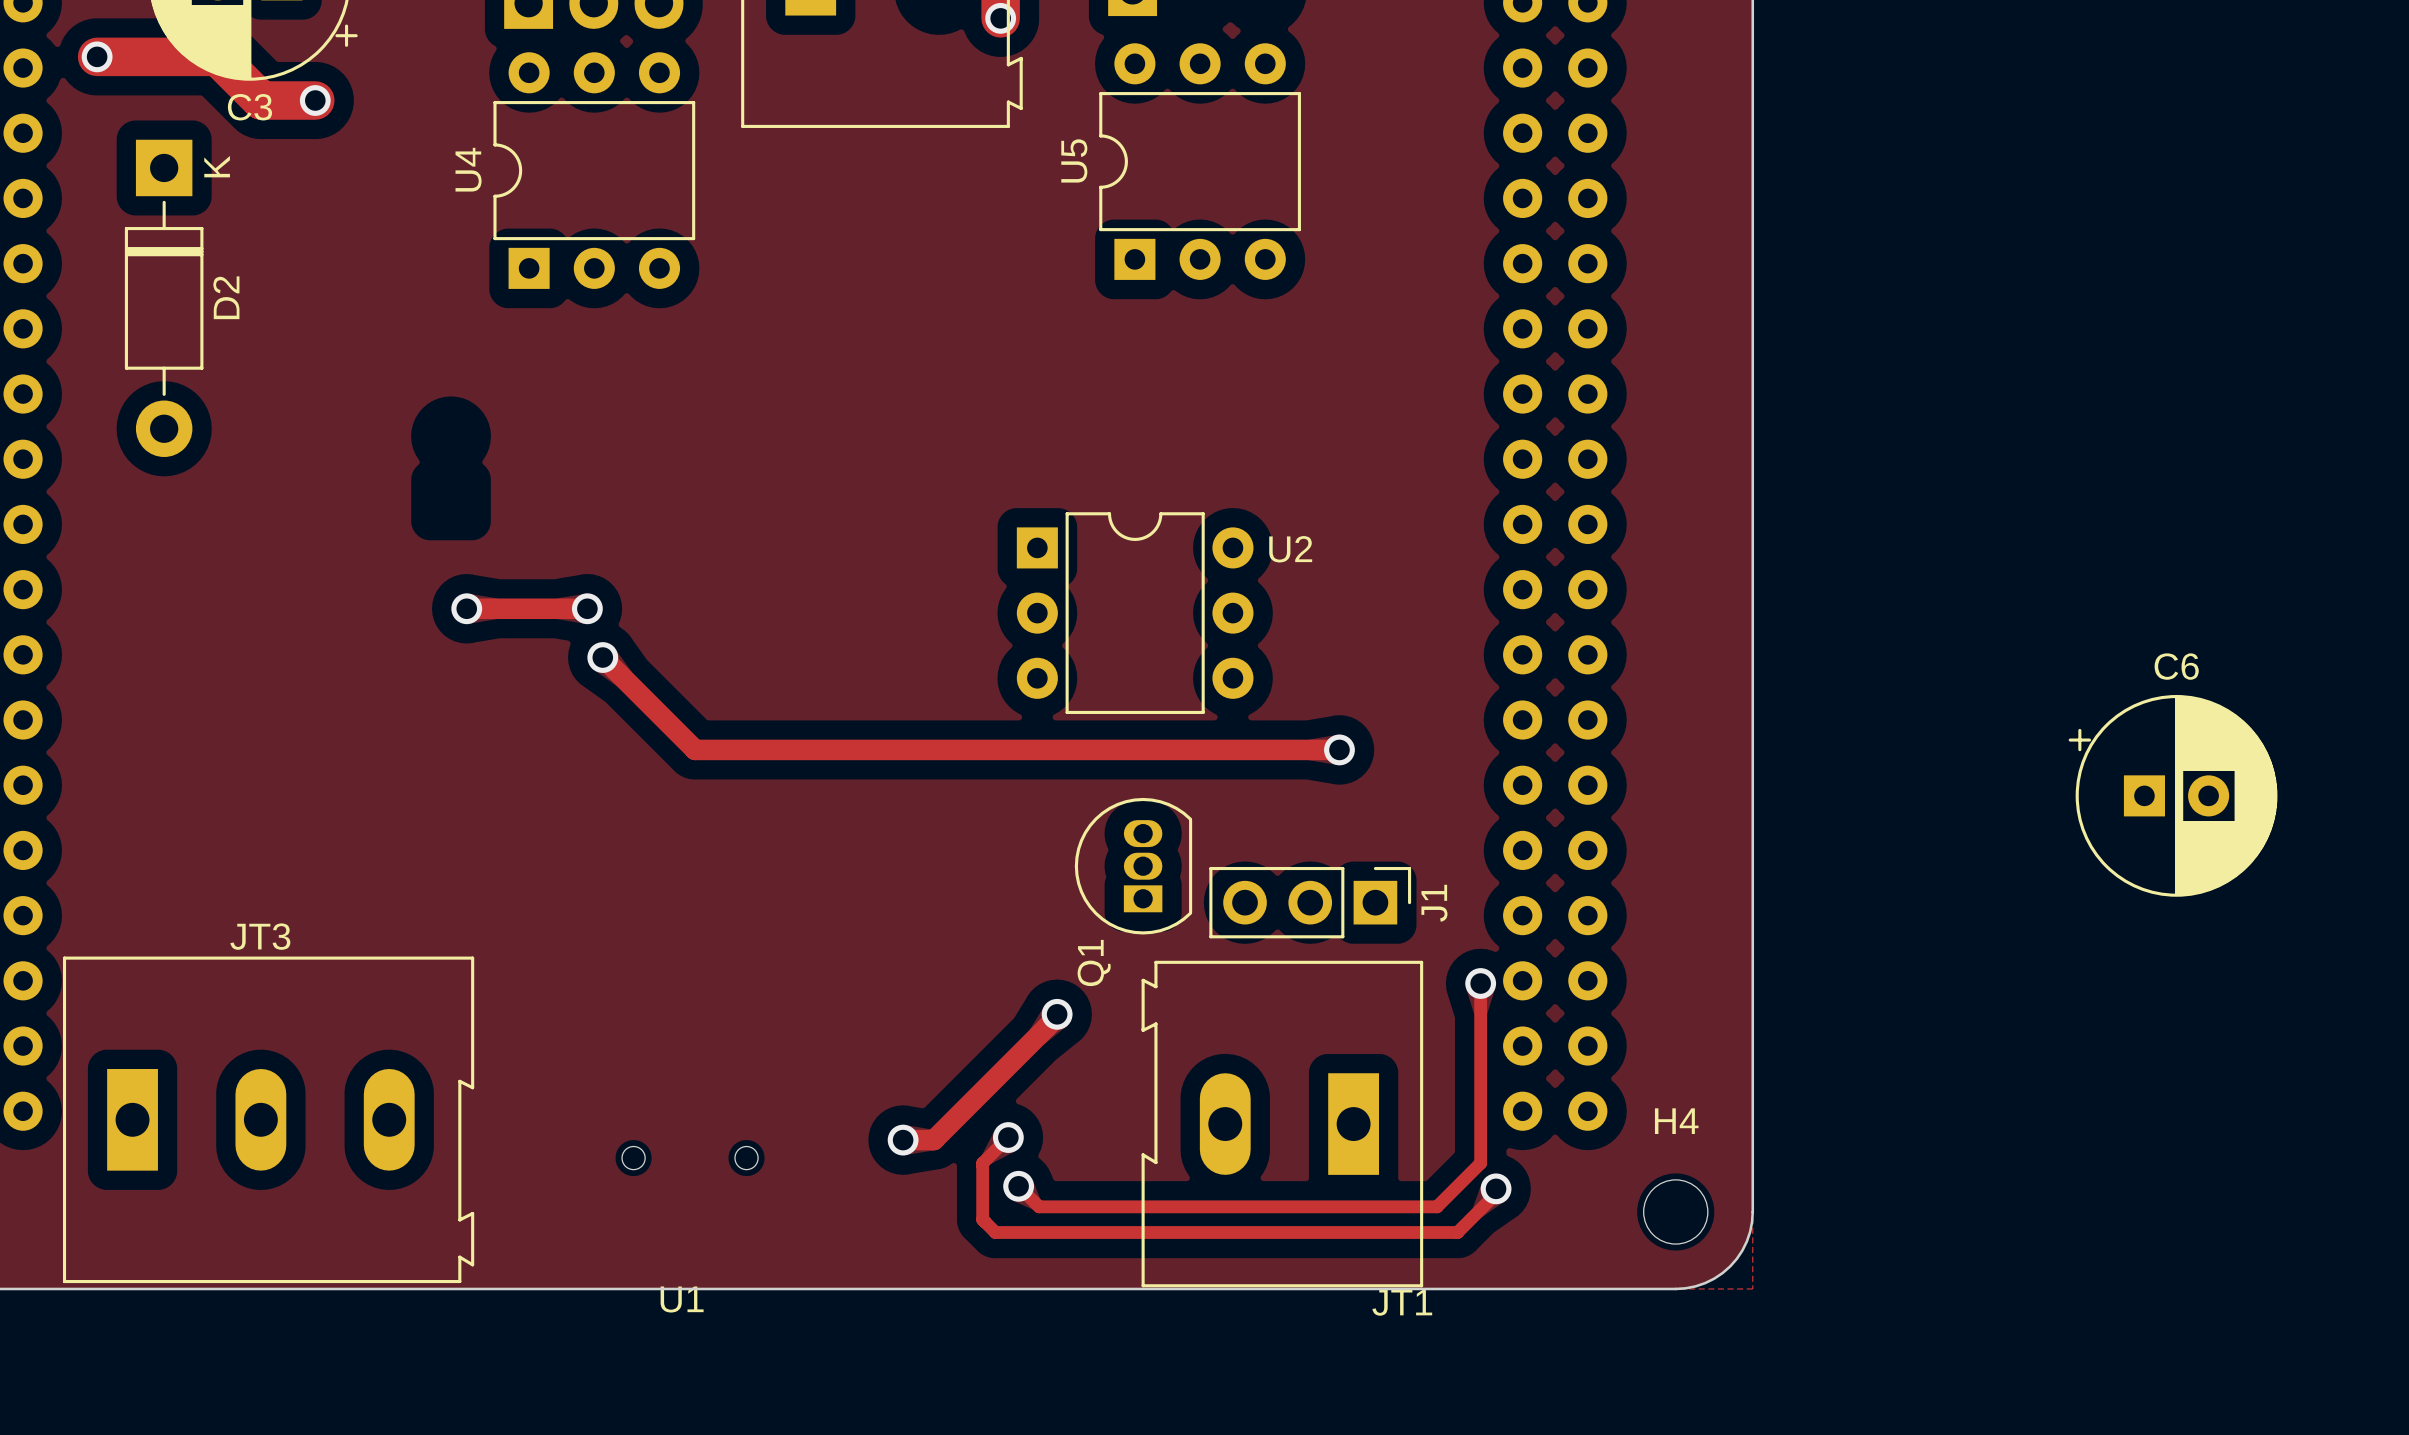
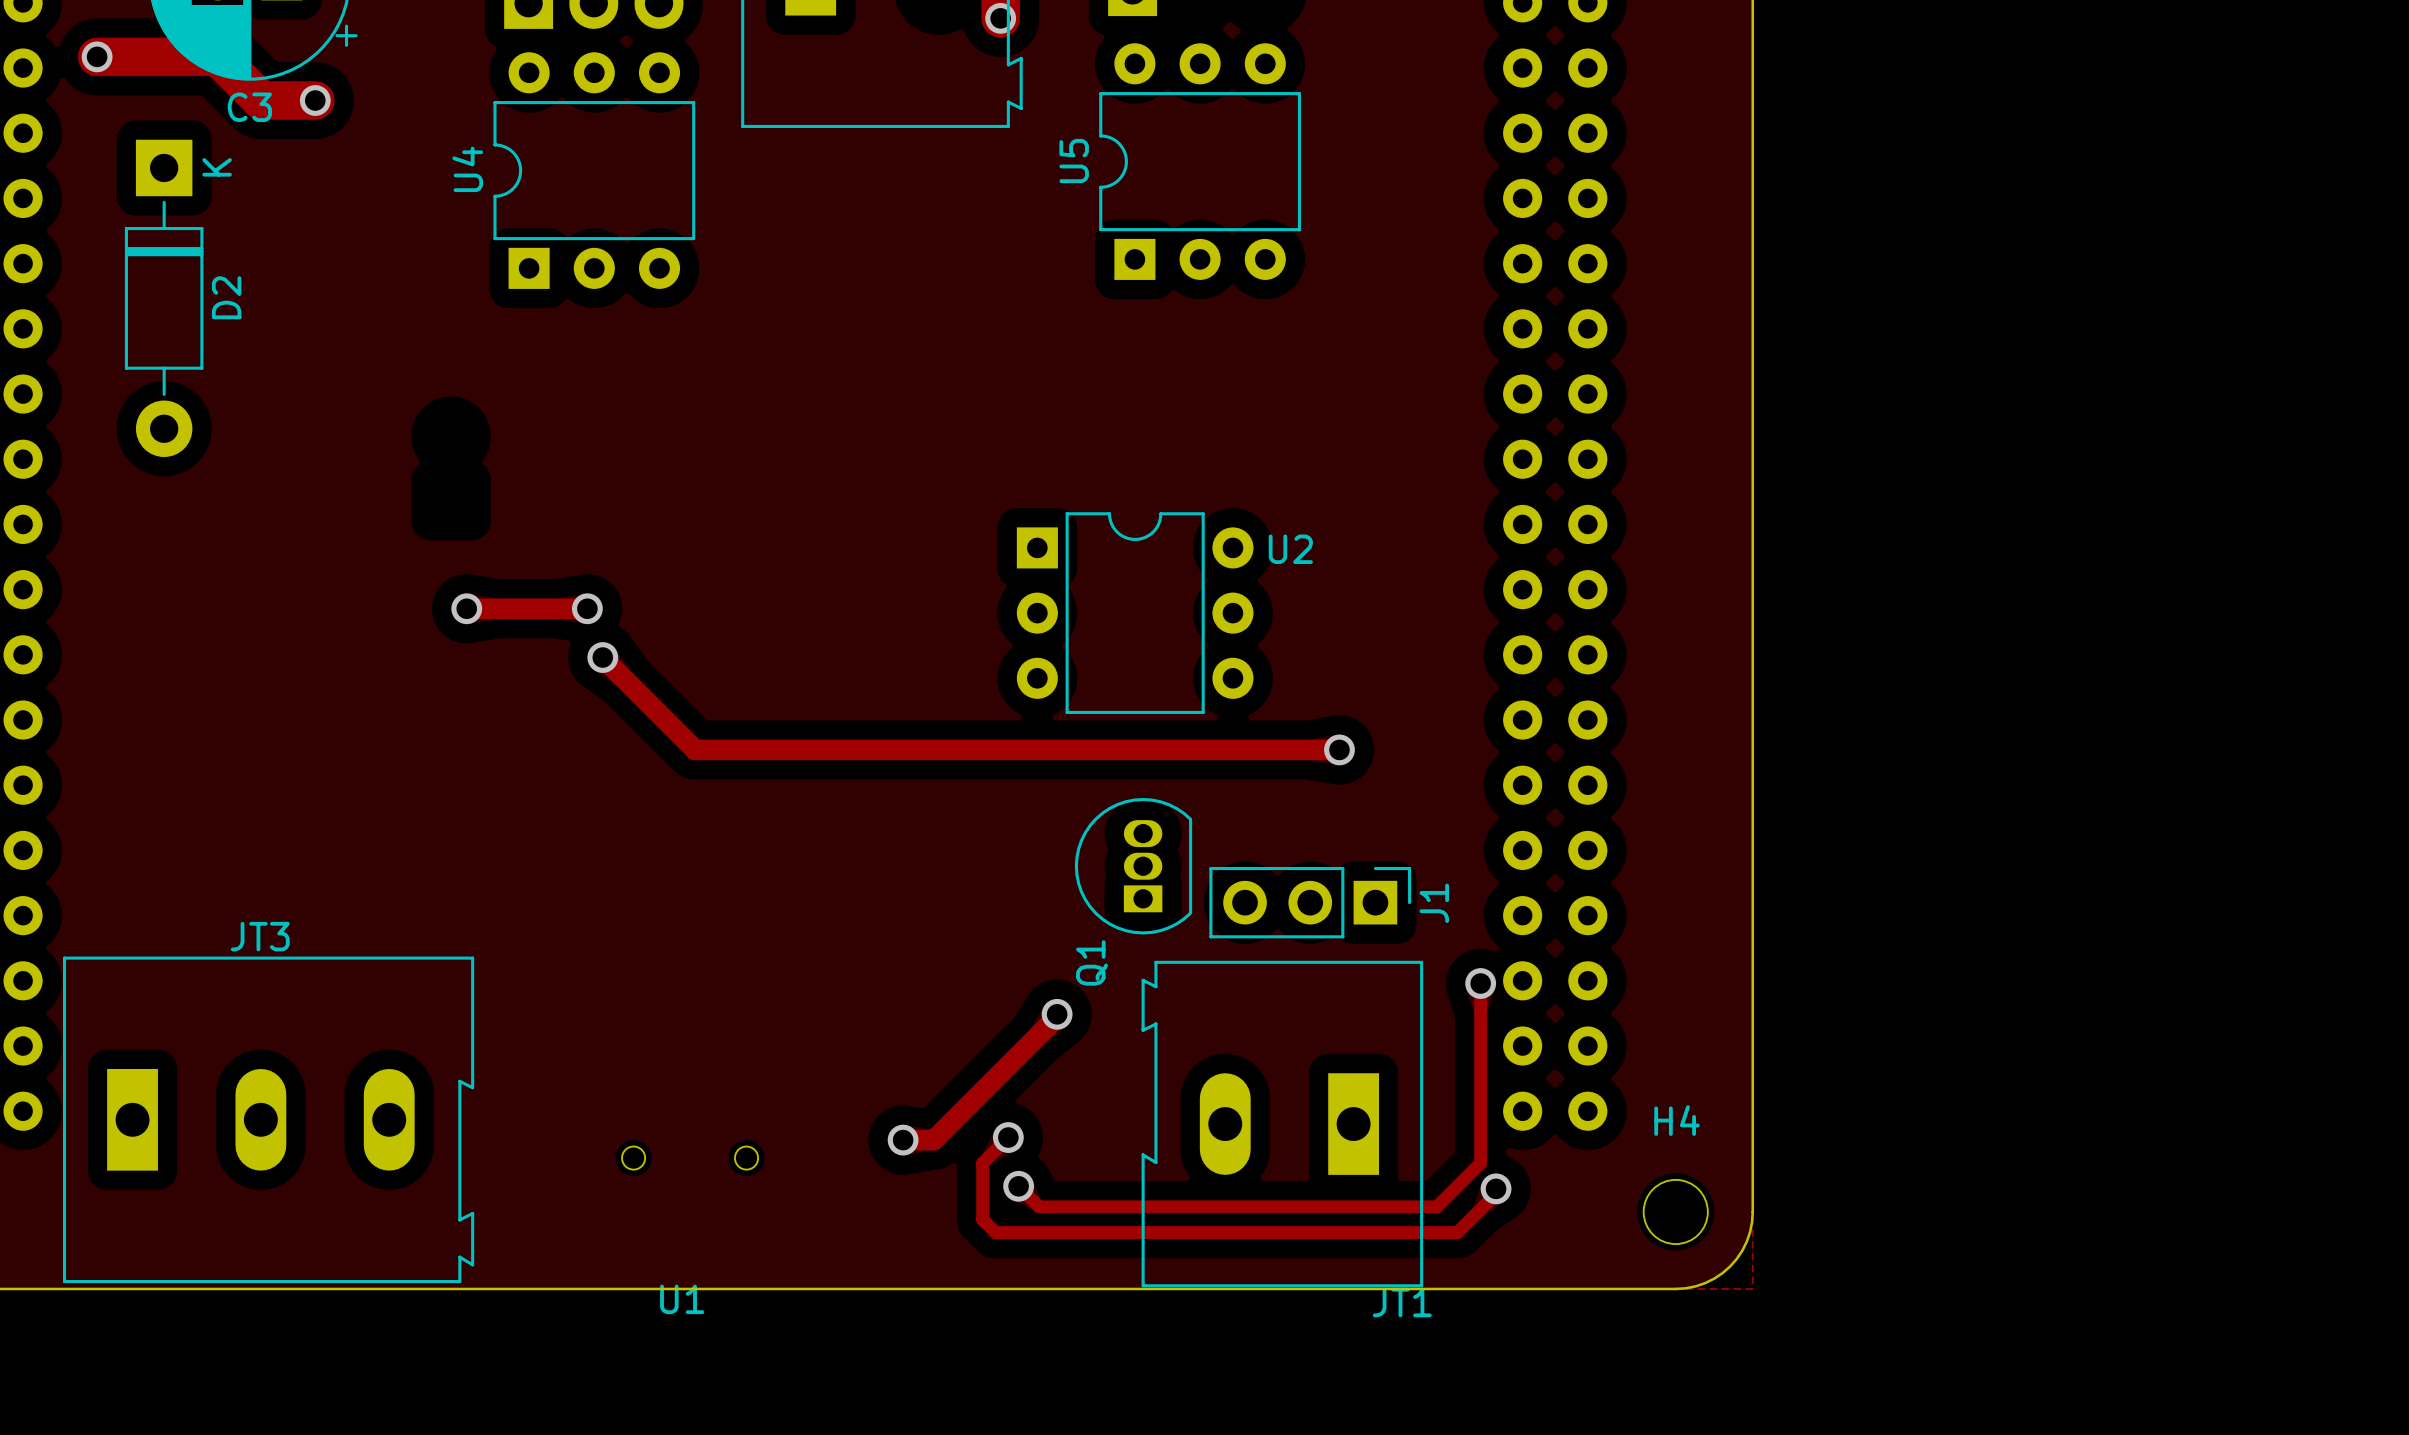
C6: (2173, 795) -> none

